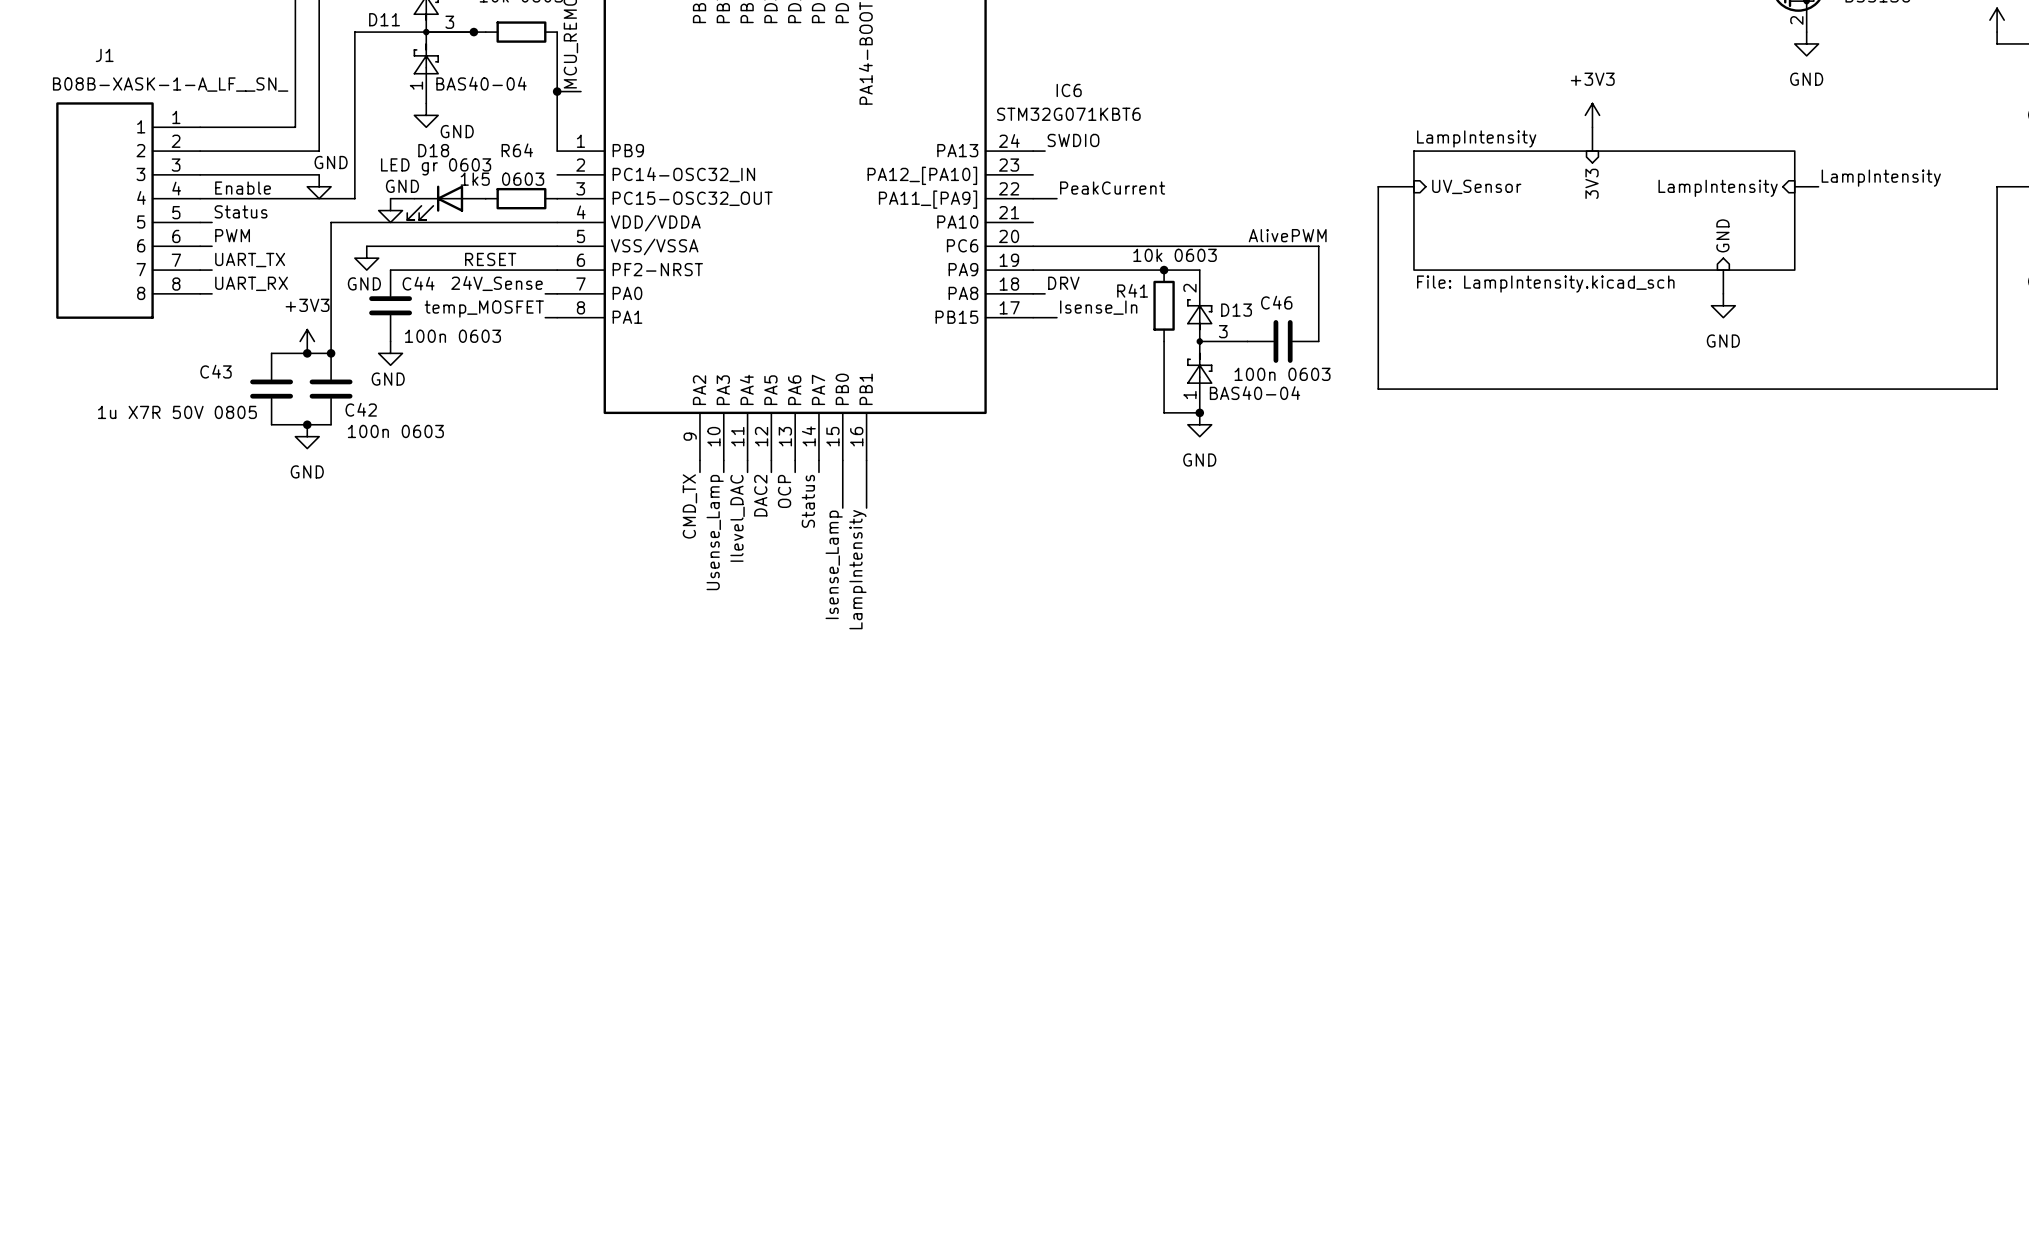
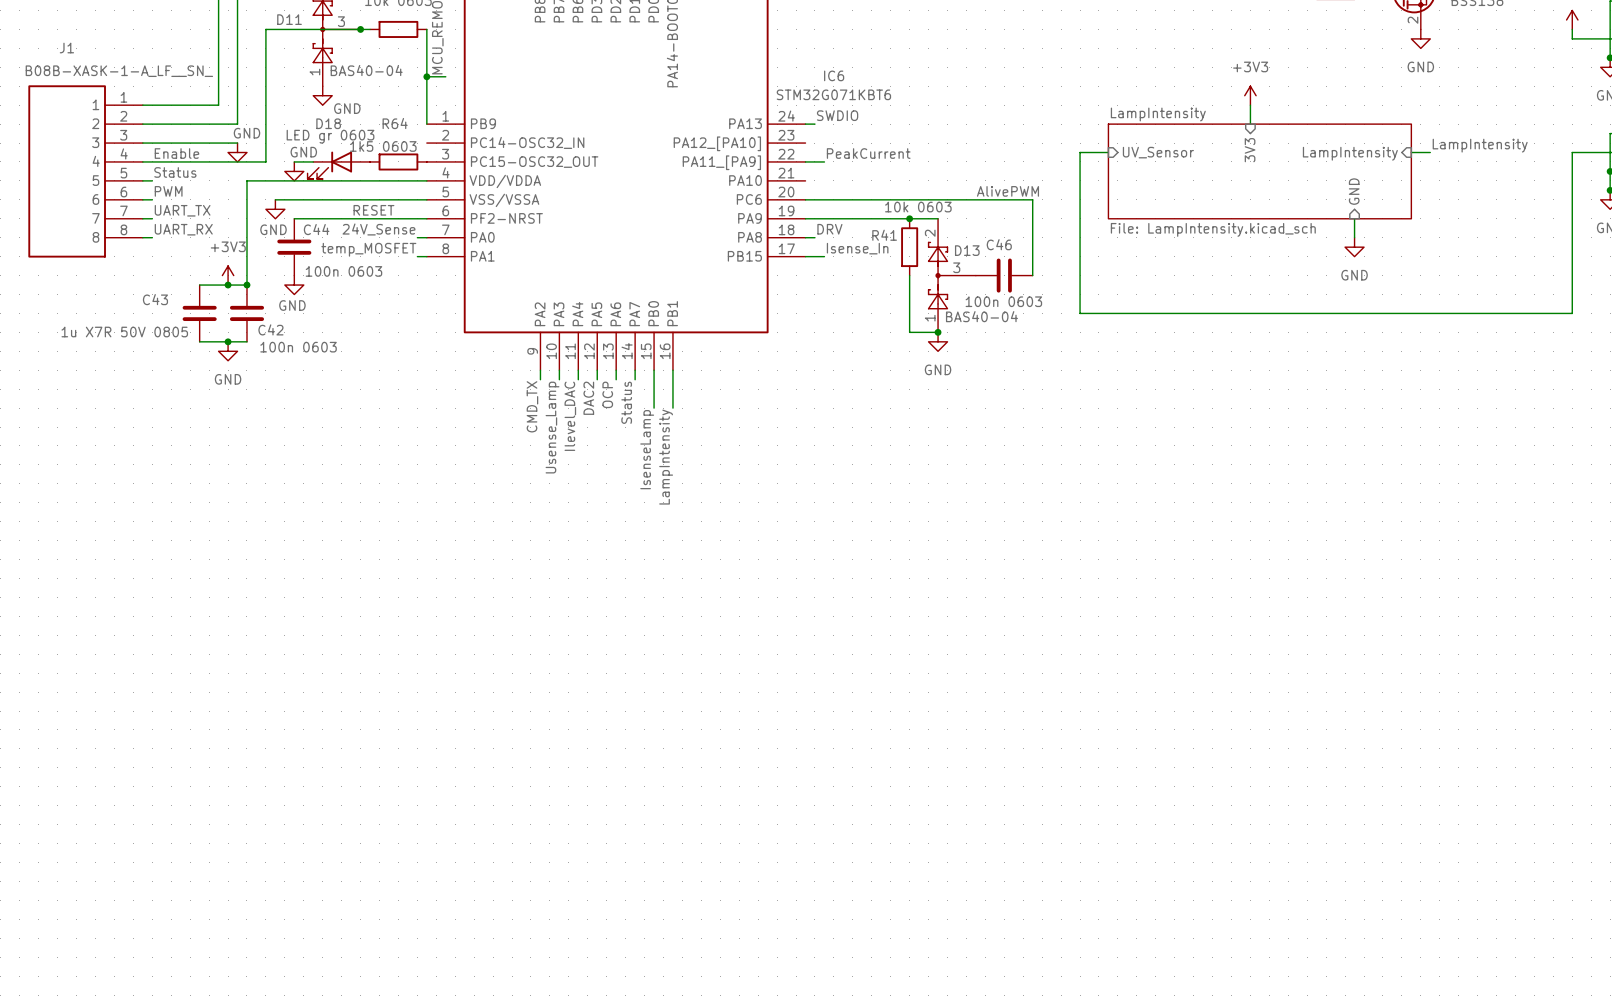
label: Isense_Lamp (834, 564) -> IsenseLamp (647, 449)

